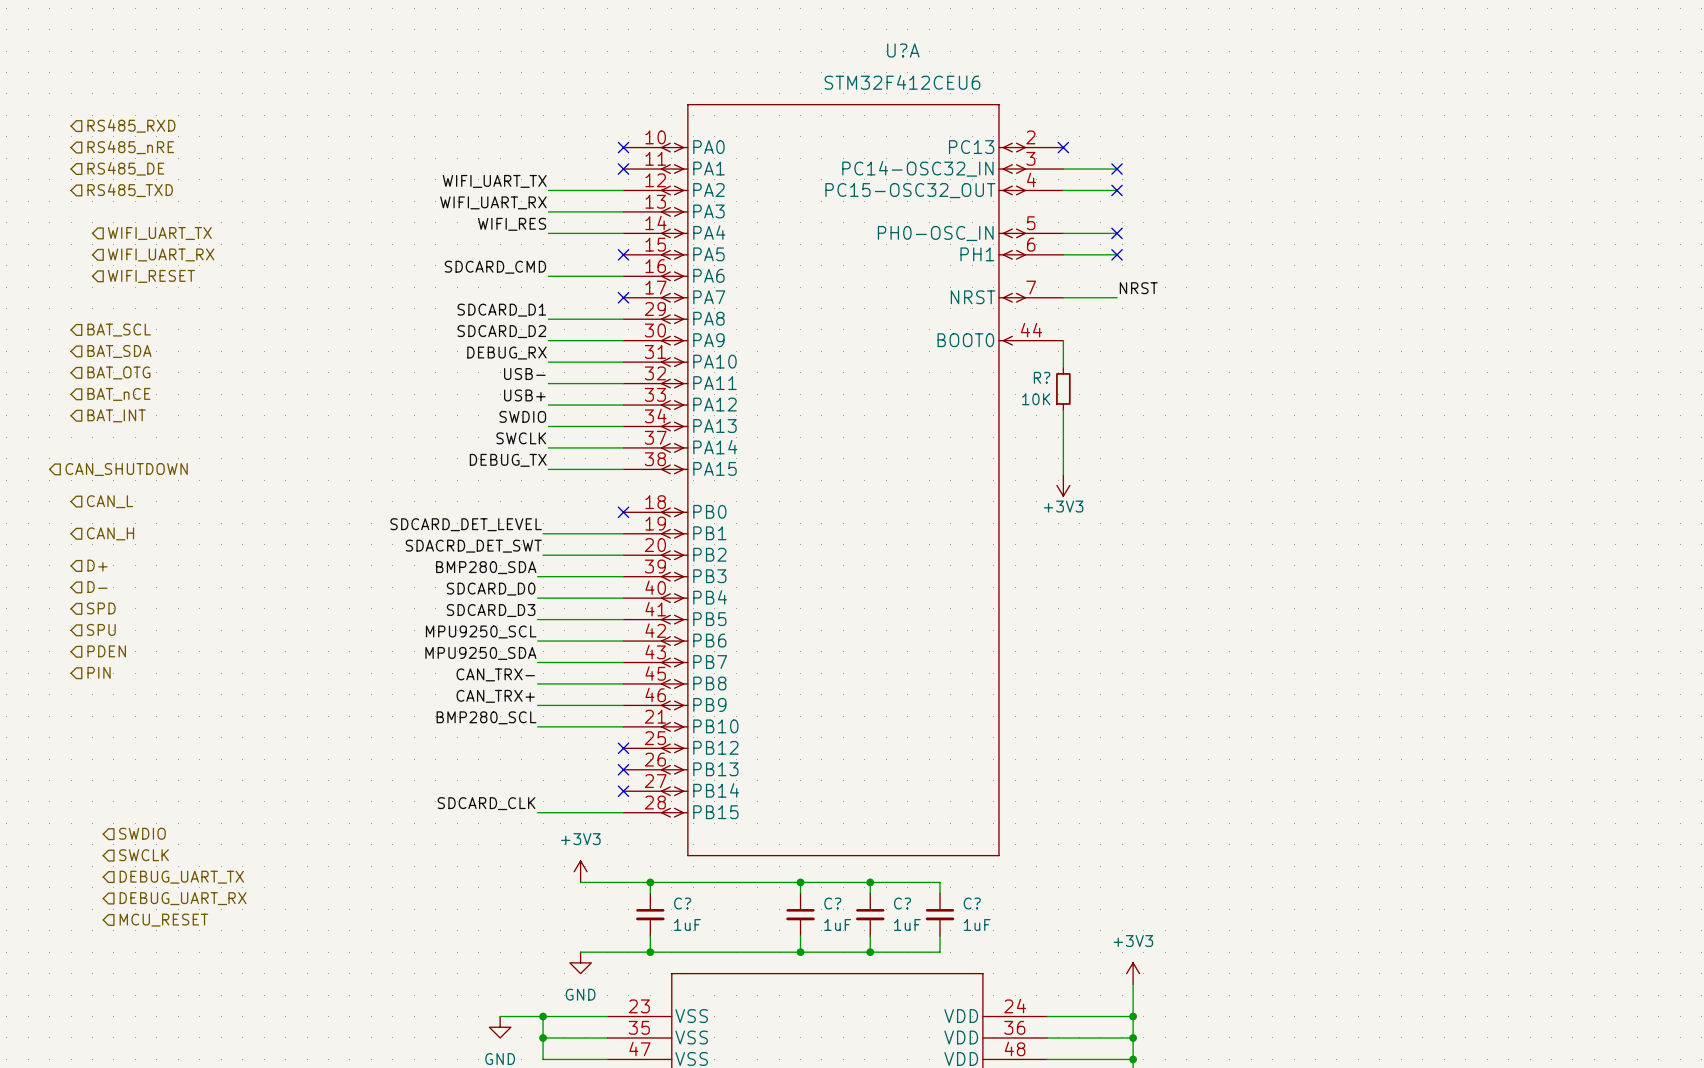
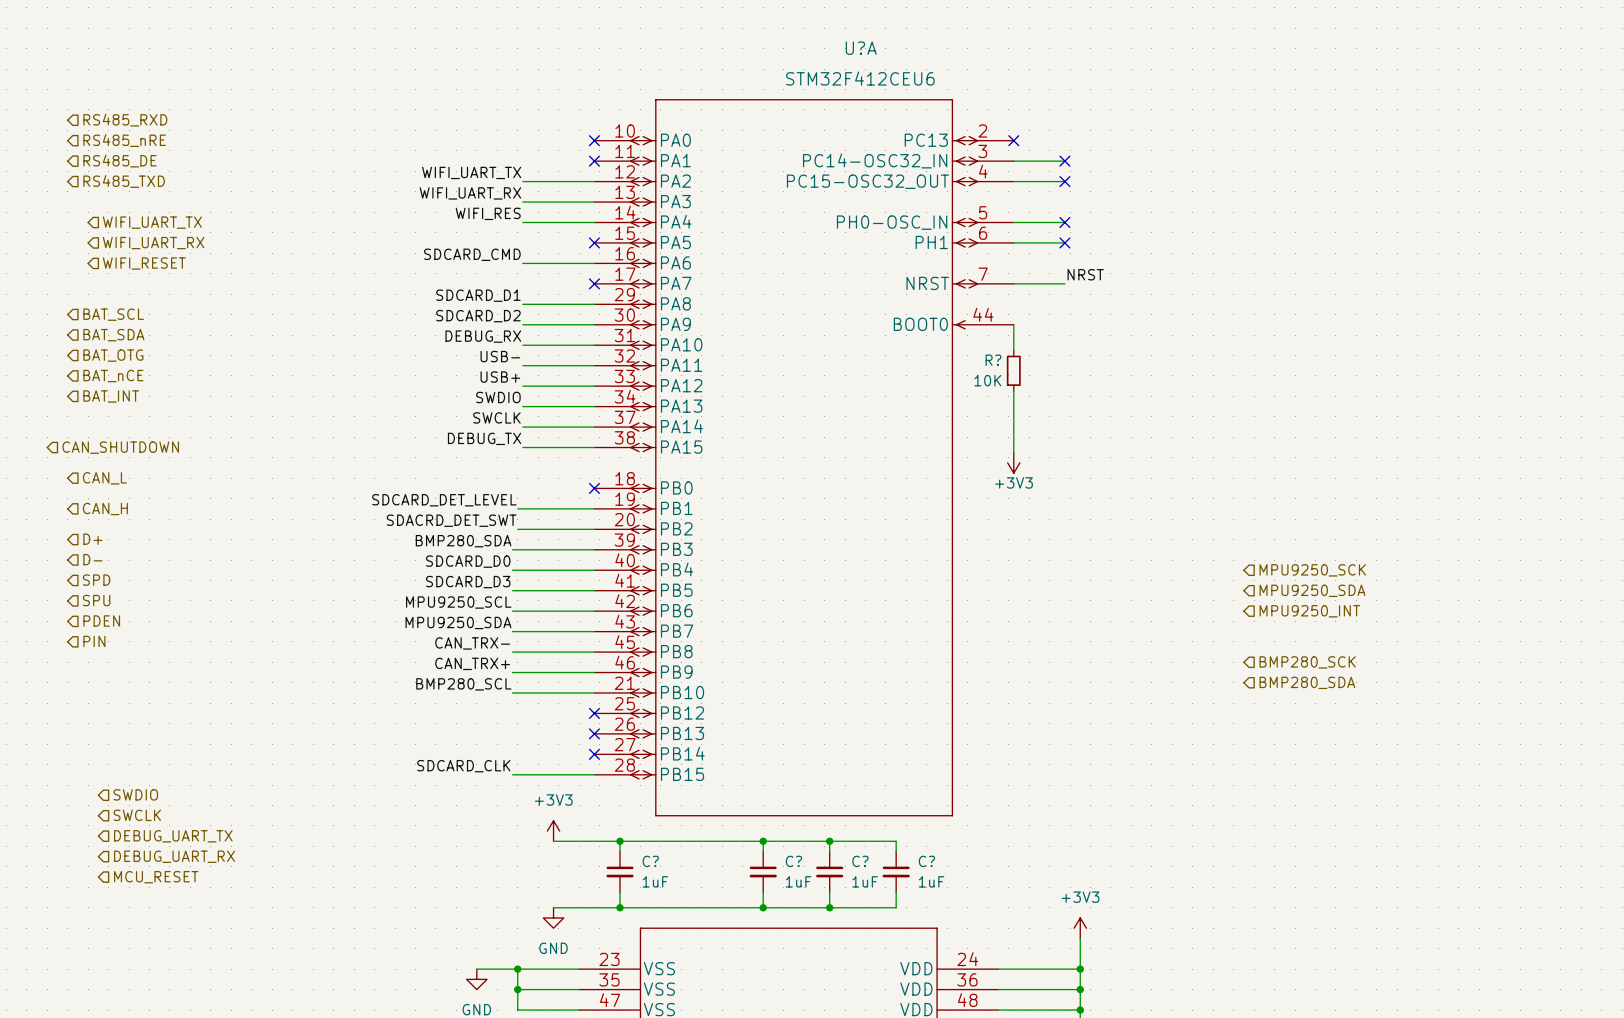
hierarchical label: none -> MPU9250_SCK (1312, 570)
hierarchical label: none -> MPU9250_SDA (1312, 590)
hierarchical label: none -> MPU9250_INT (1309, 611)
hierarchical label: none -> BMP280_SCK (1307, 662)
hierarchical label: none -> BMP280_SDA (1307, 682)

